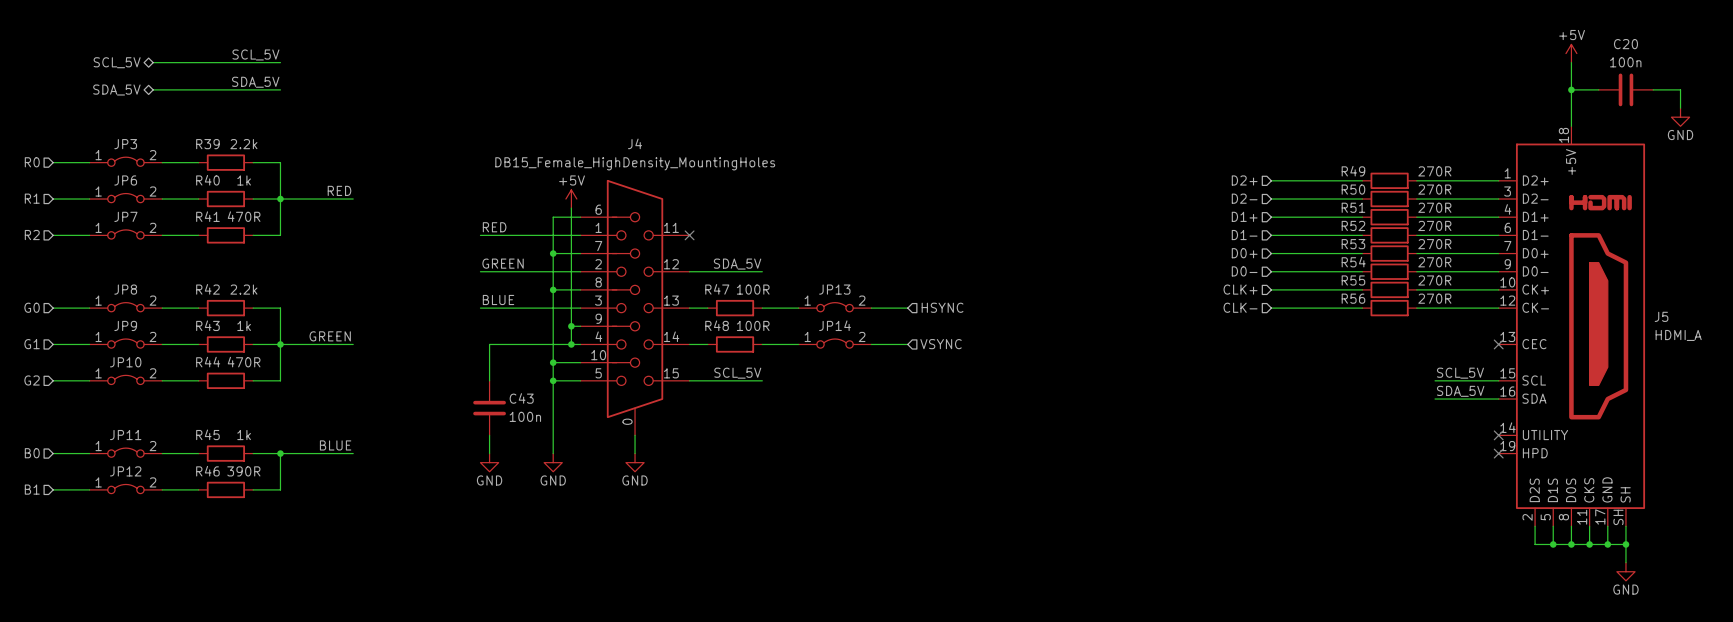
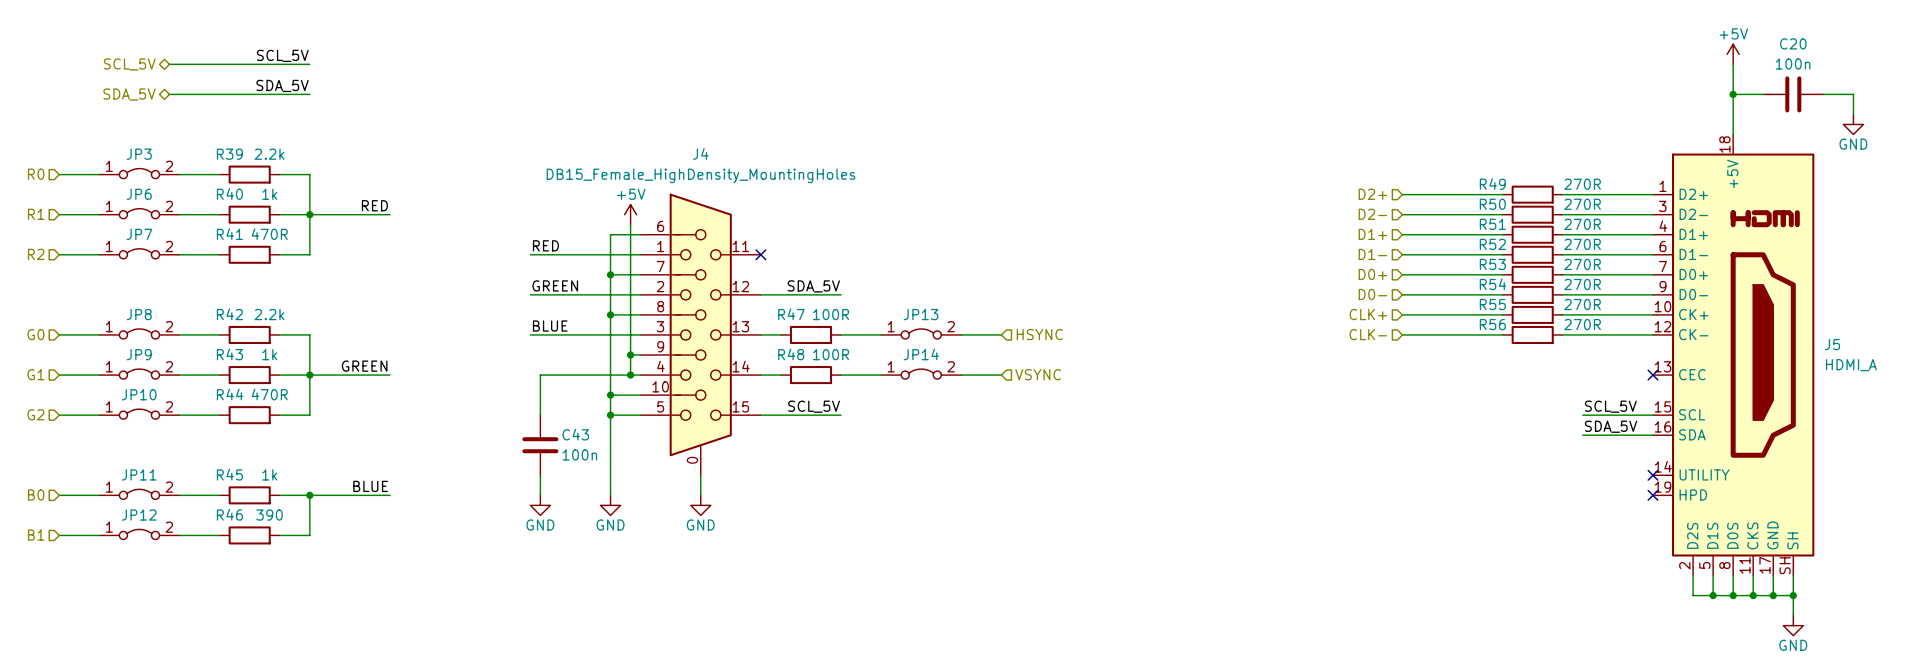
R46 value: 390R (243, 471) -> 390 (269, 515)

